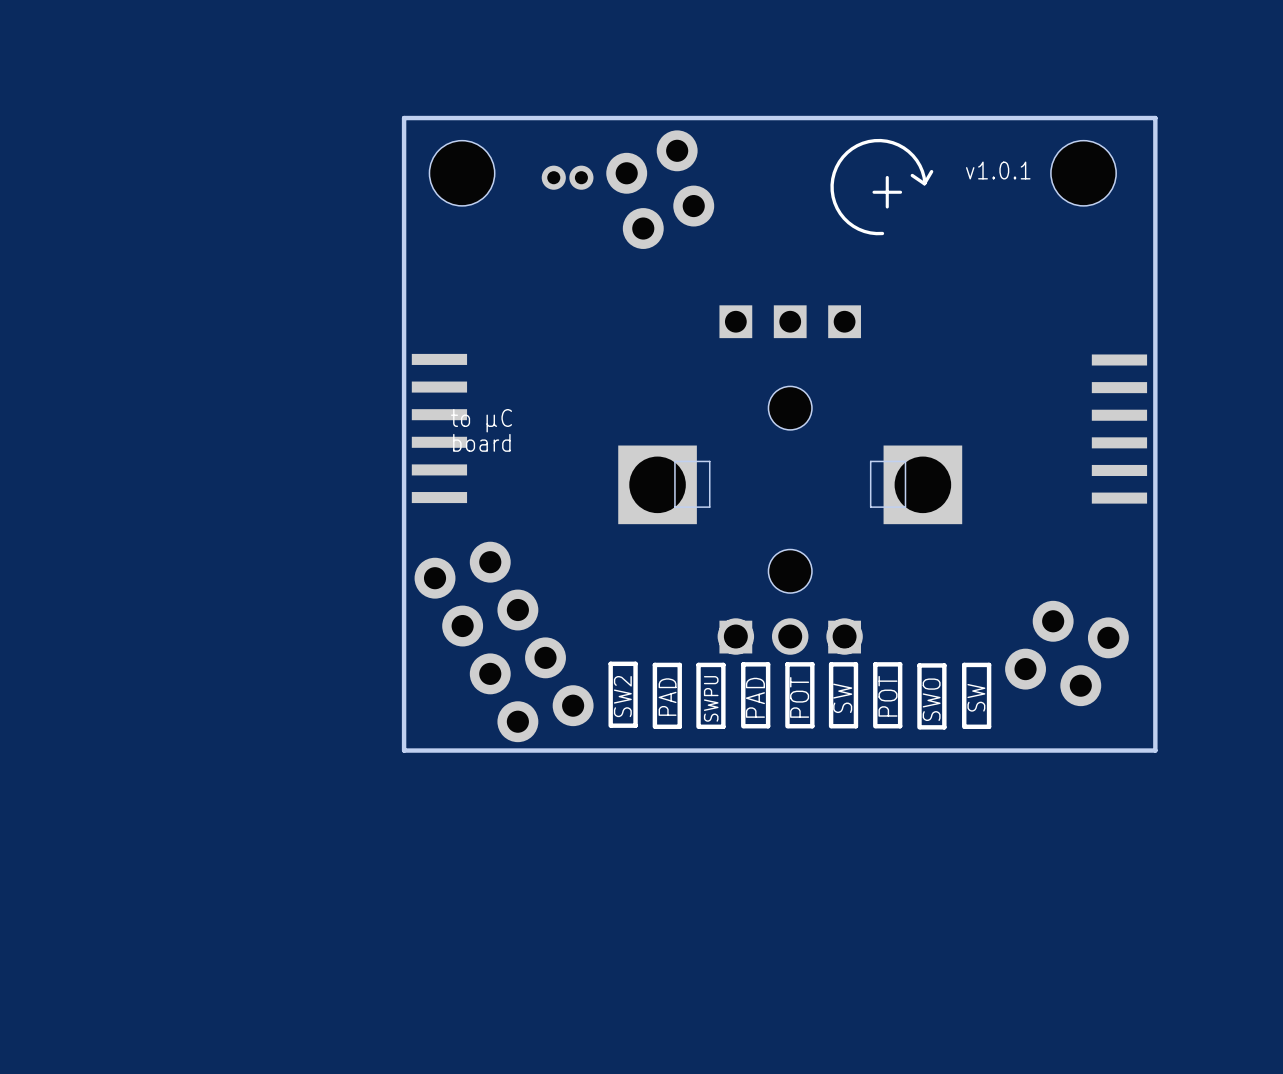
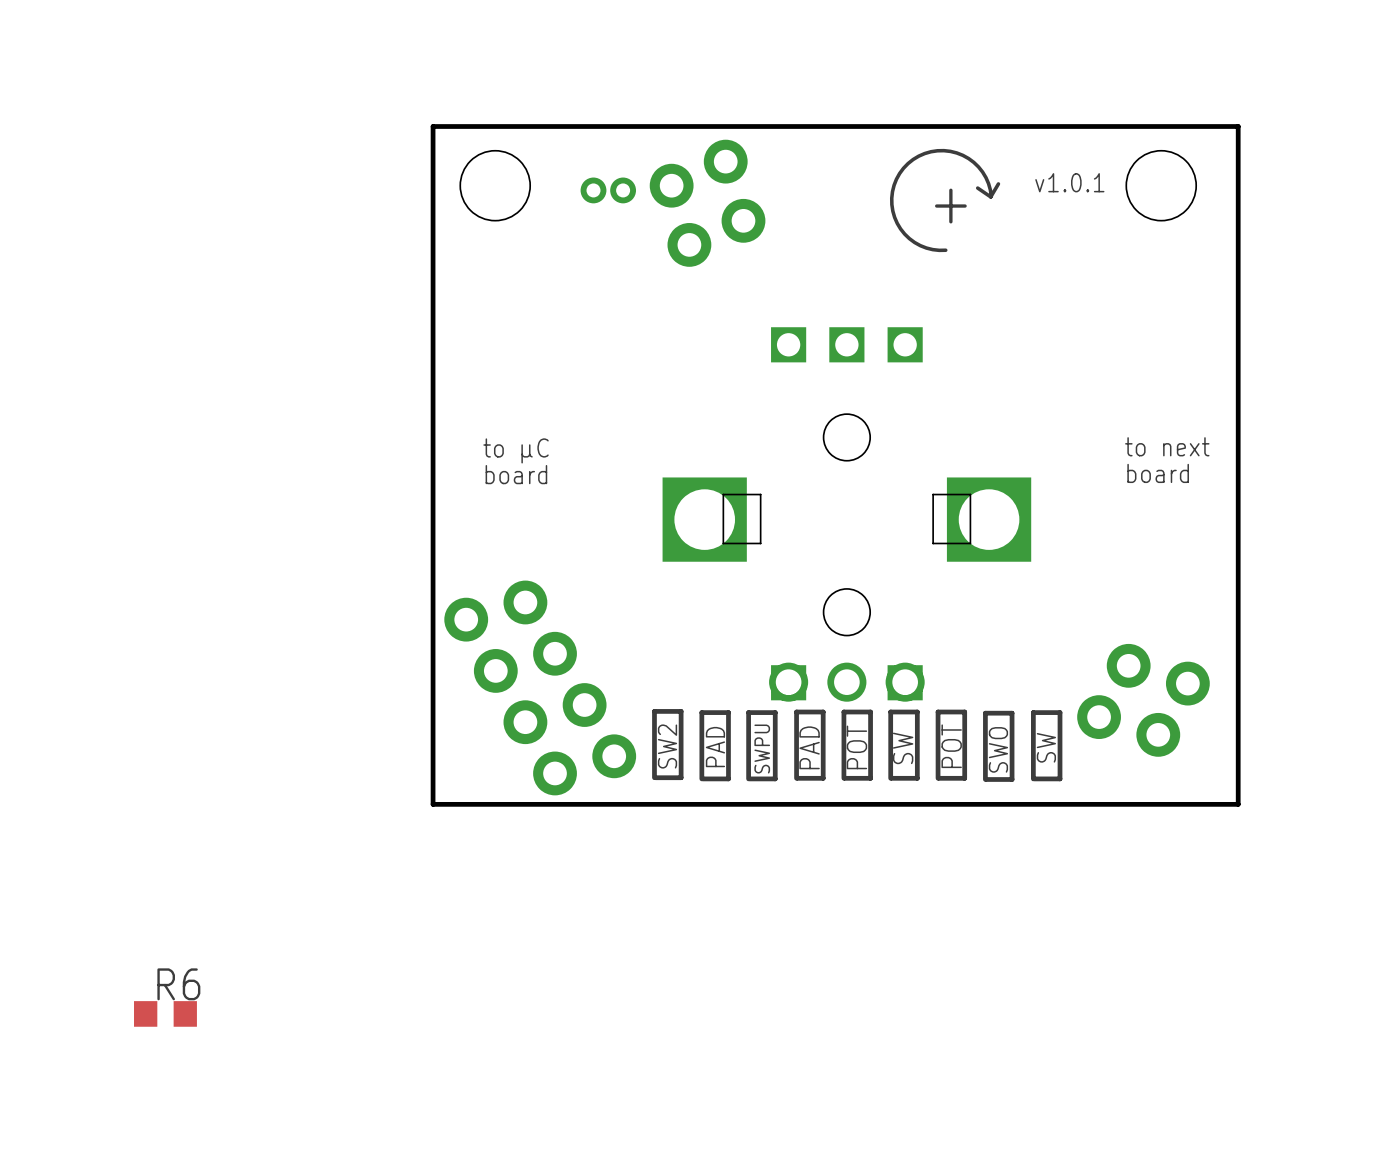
text: none -> to next (1167, 446)
part: (439, 428) -> none
part: (1119, 429) -> none
text: none -> board (1158, 473)
R6: none -> (165, 1013)

